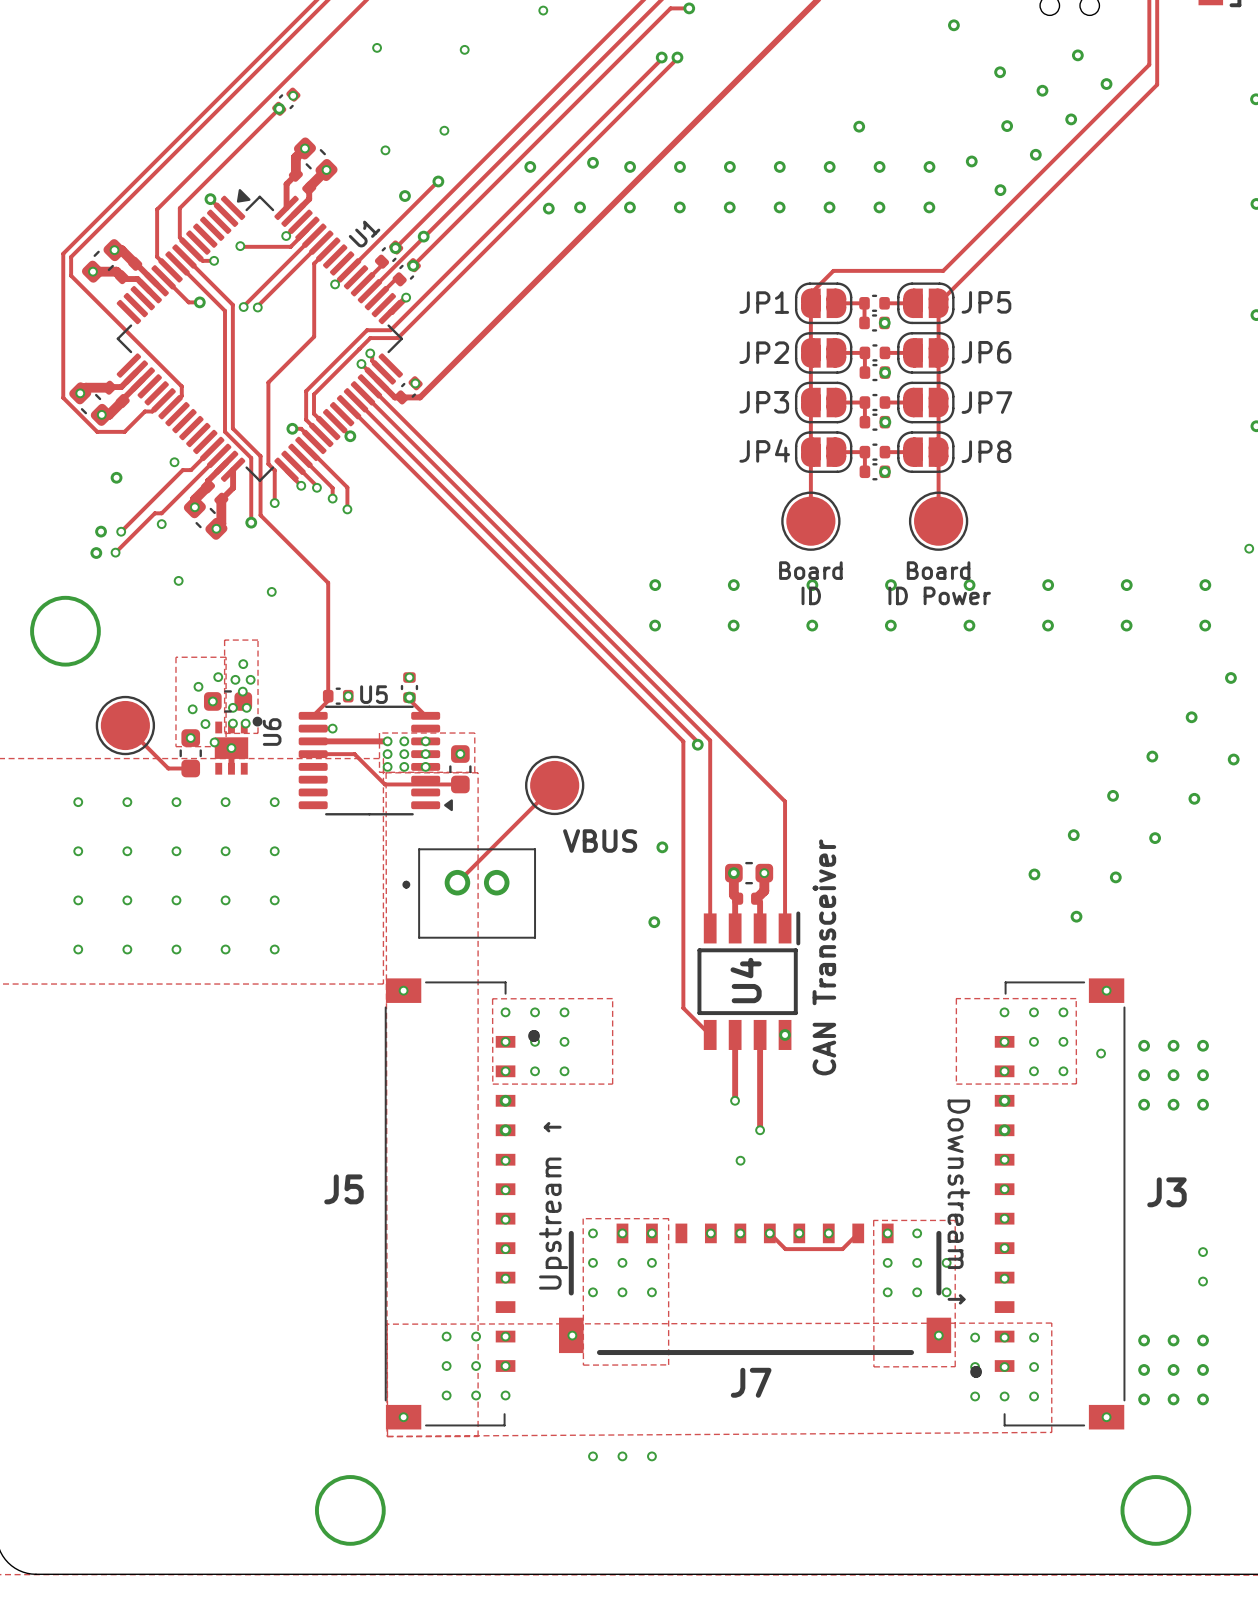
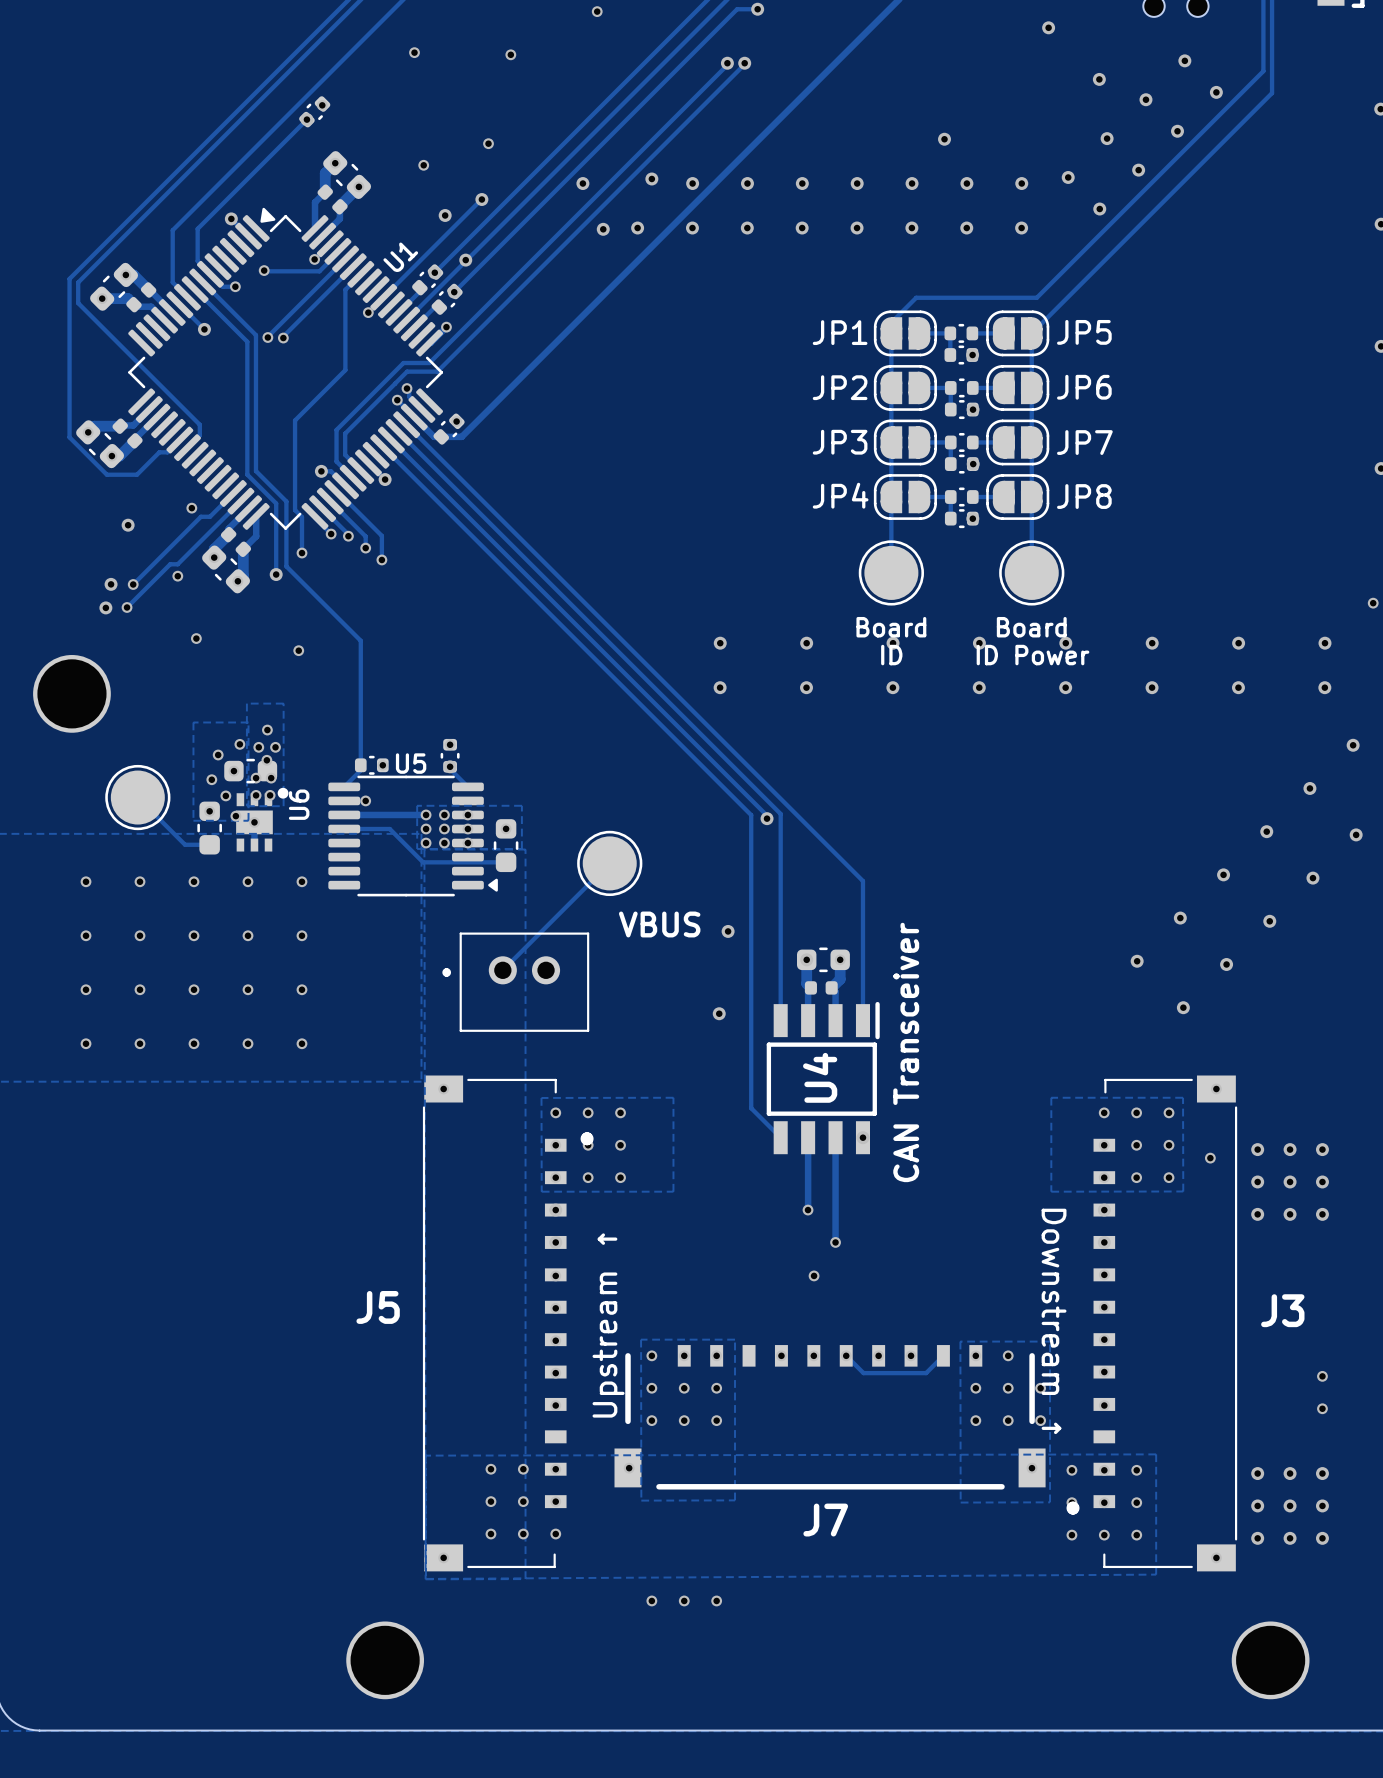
track: (185, 299) (188, 302) (199, 302) -> none
via position: (199, 302) -> (204, 329)

